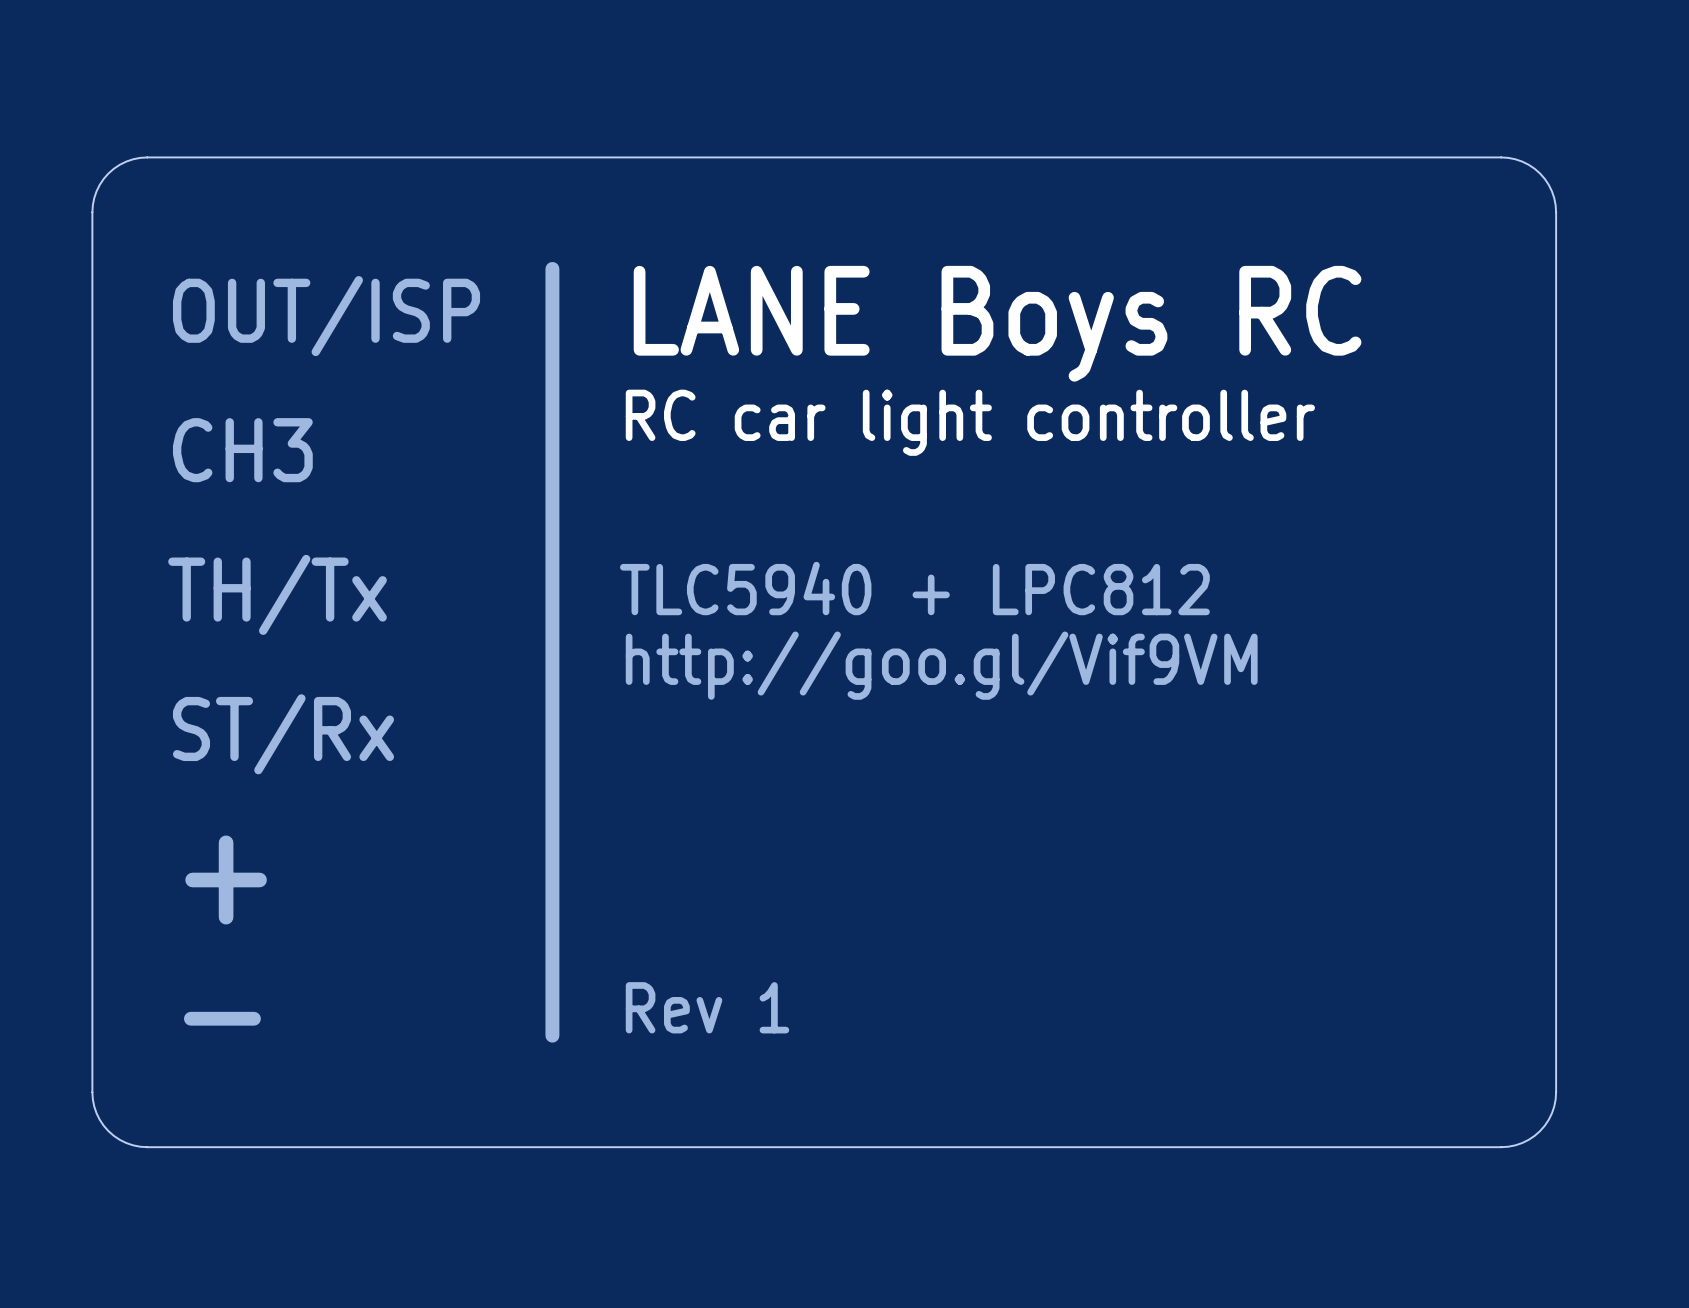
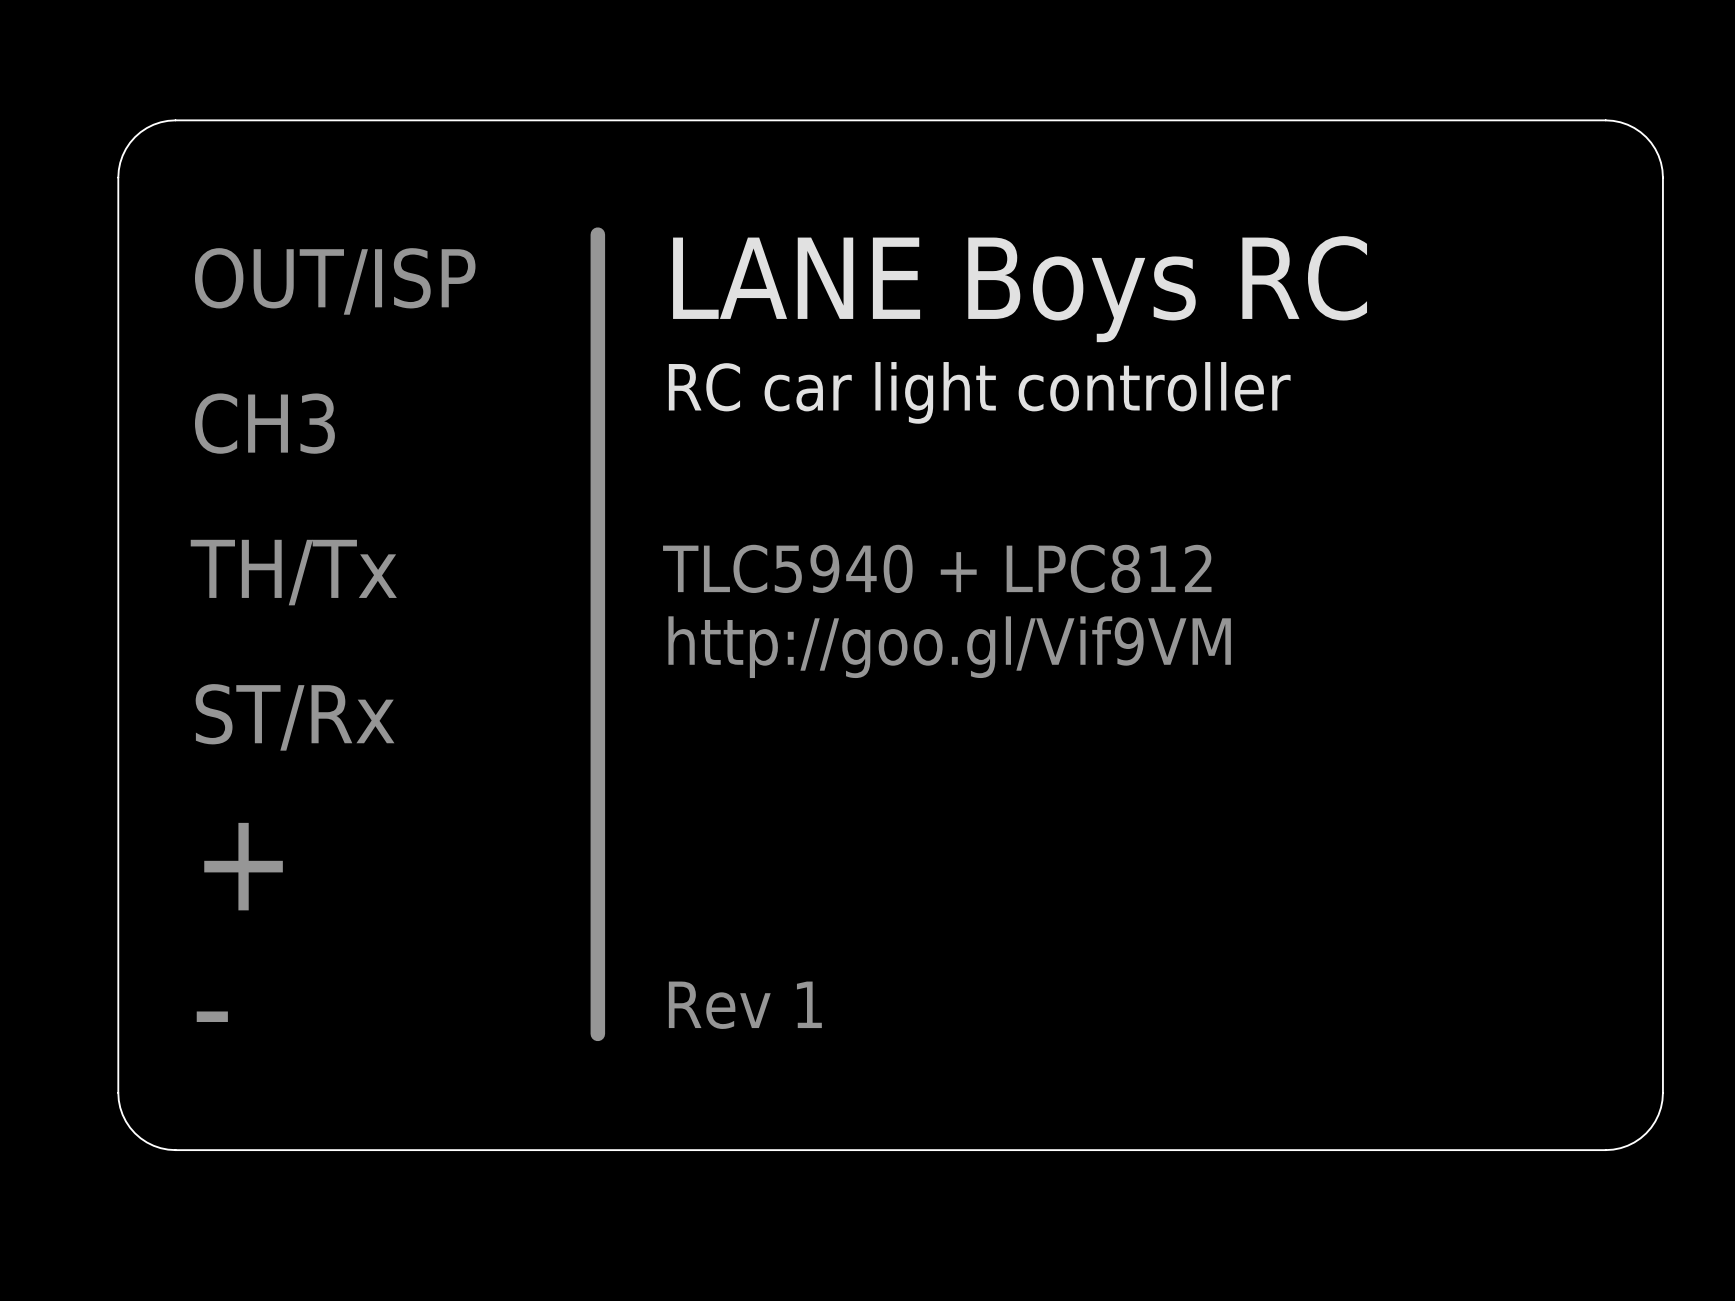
board edge: (92, 214) (96, 191) (108, 173) (126, 161) (147, 157) (1501, 157) (1515, 159) (1528, 164) (1540, 173) (1548, 184) (1554, 198) (1556, 212) (1556, 1092) (1551, 1113) (1540, 1131) (1522, 1143) (1501, 1147) -> (118, 177) (122, 155) (135, 137) (153, 124) (175, 120) (1605, 120) (1620, 122) (1634, 128) (1646, 137) (1655, 148) (1661, 162) (1662, 177) (1662, 1092) (1658, 1114) (1651, 1127) (1640, 1138) (1620, 1148) (1586, 1150)

